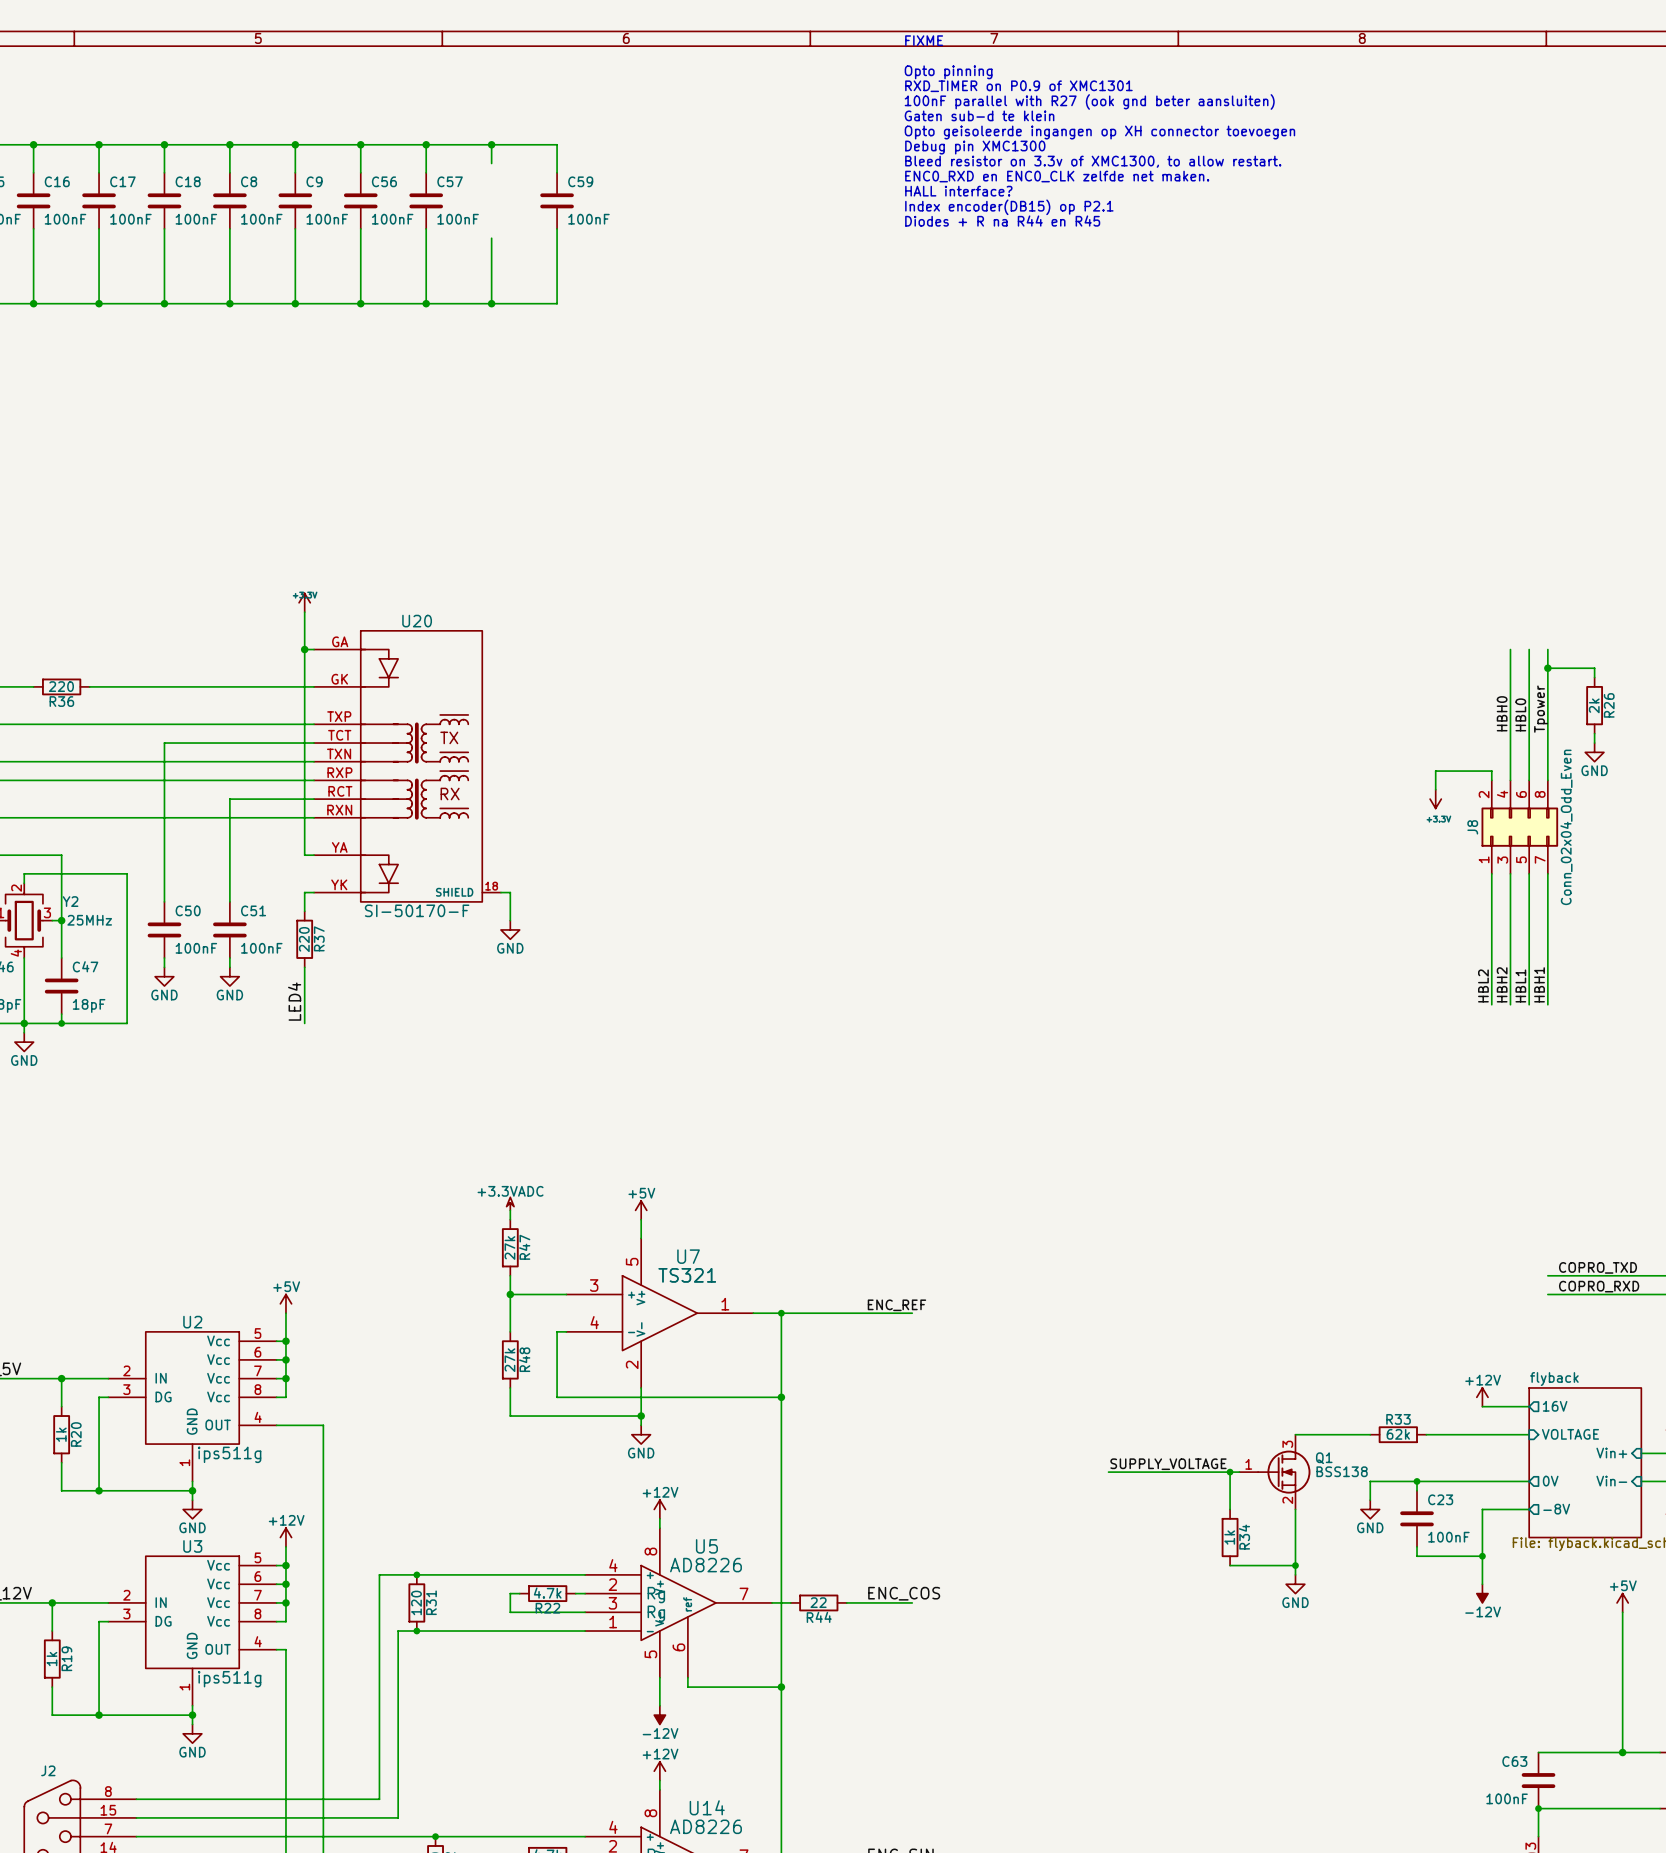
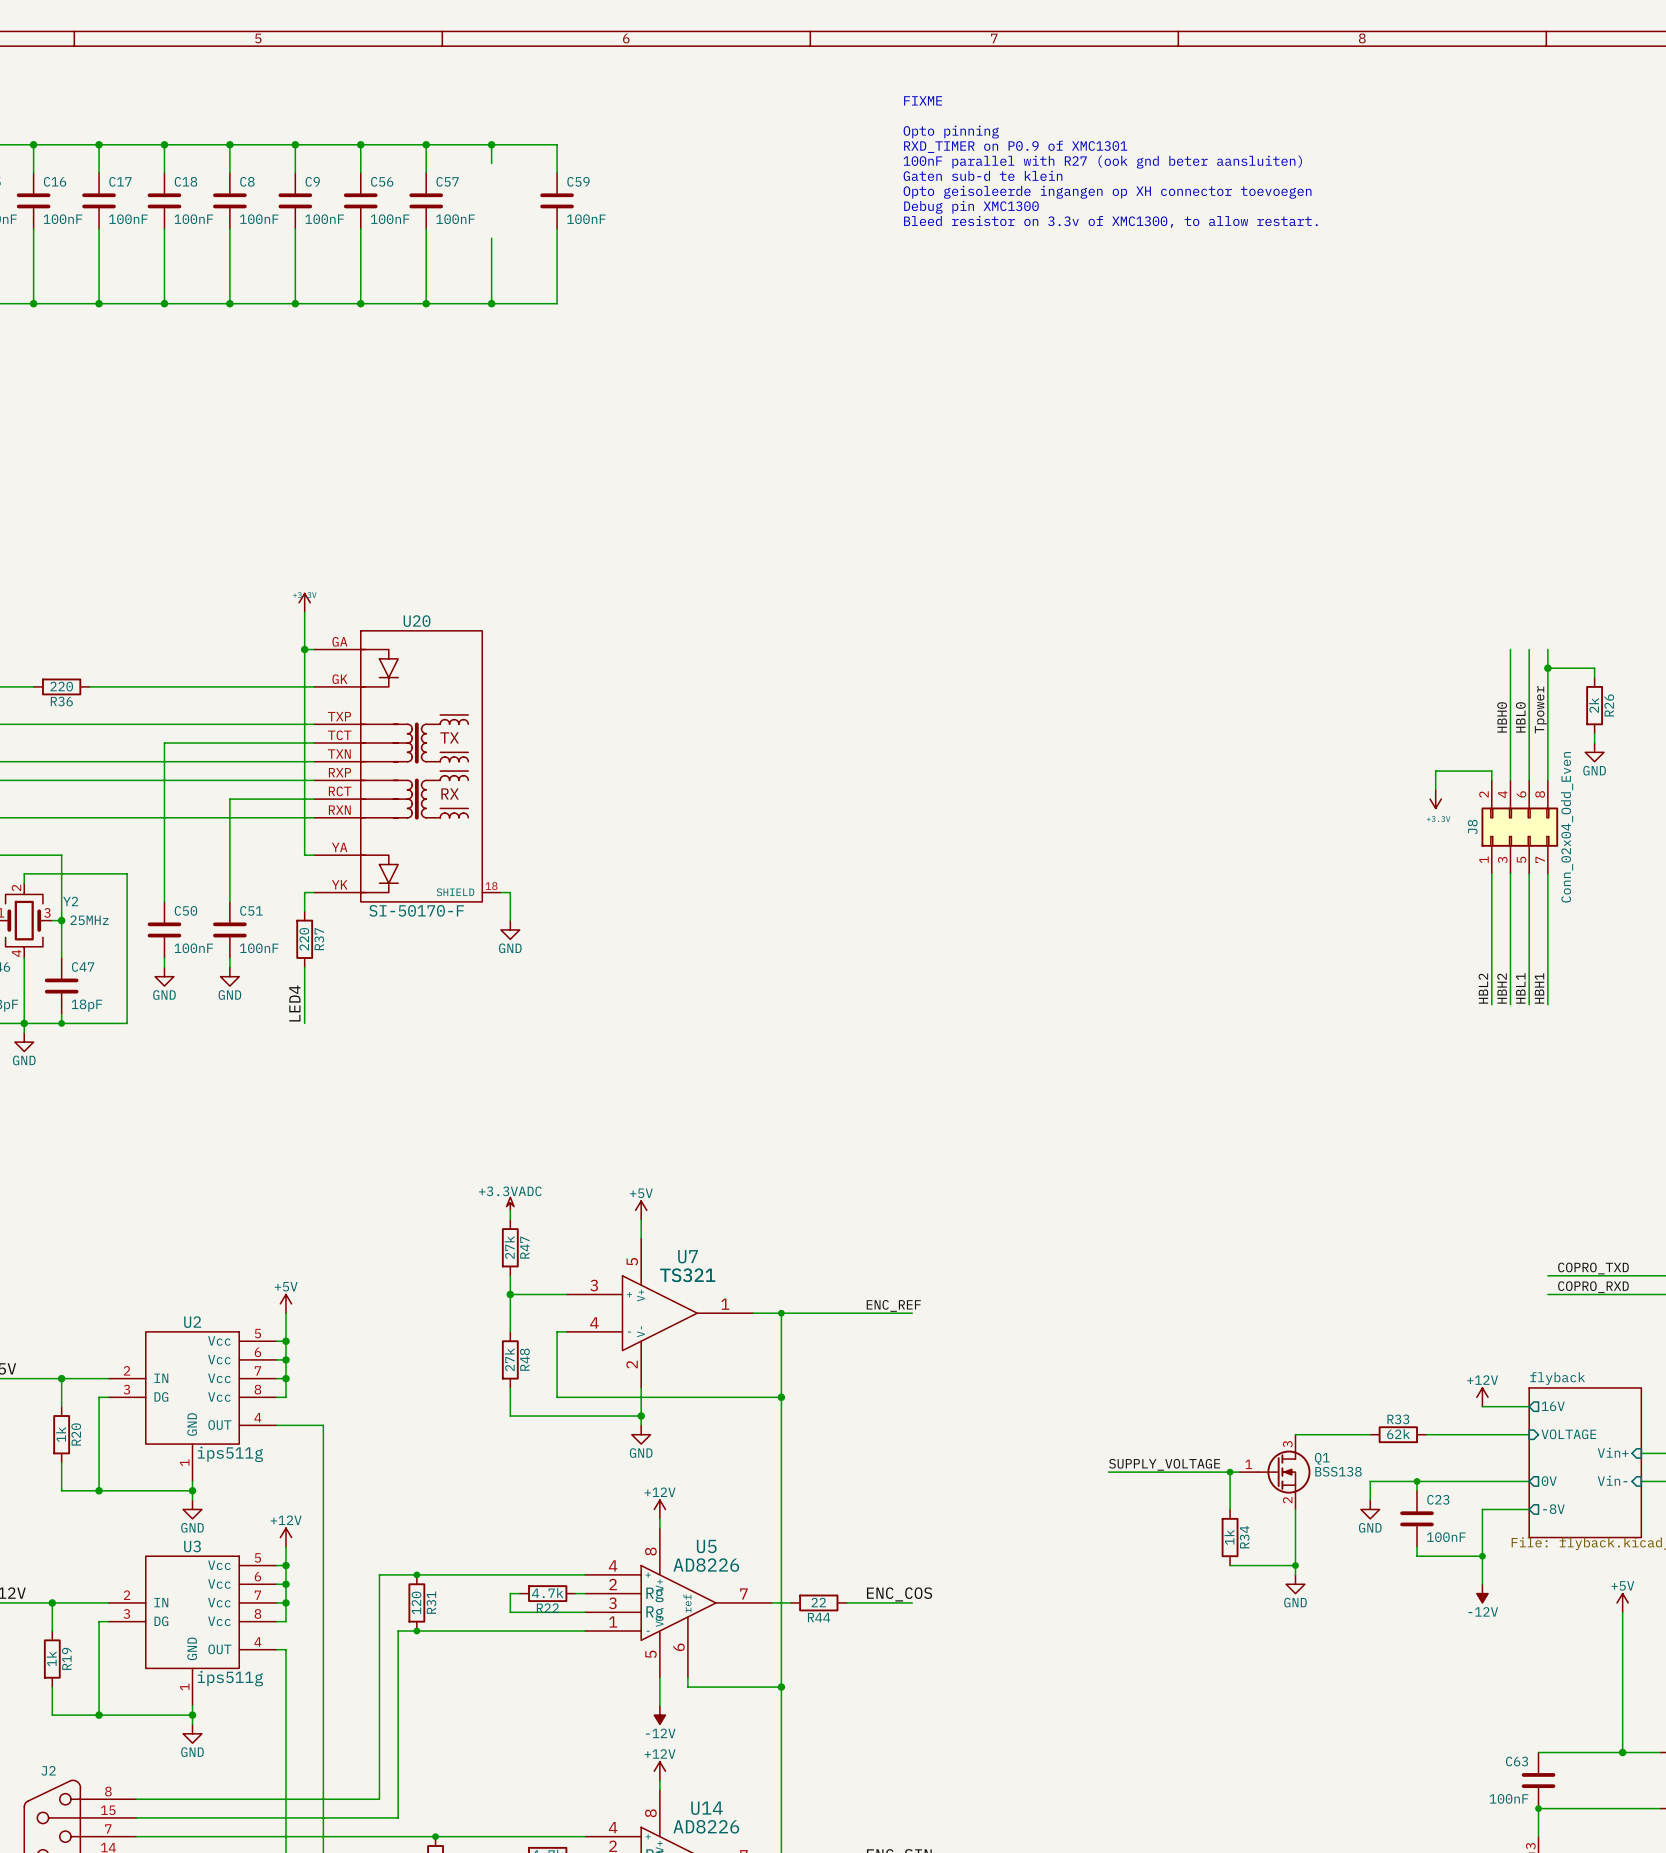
text: FIXME (924, 40) -> none
text: Opto pinning (948, 72) -> none
text: RXD_TIMER on P0.9 of XMC1301 (1018, 86) -> none
text: 100nF parallel with R27 (ook gnd beter aansluiten) (1089, 101) -> FIXME (923, 100)
text: Gaten sub-d te klein (979, 115) -> none
text: Opto geisoleerde ingangen op XH connector toevoegen (1099, 132) -> Opto pinning (951, 132)
text: Debug pin XMC1300 (975, 147) -> RXD_TIMER on P0.9 of XMC1301 (1015, 146)
text: Bleed resistor on 3.3v of XMC1300, to allow restart. (1093, 161) -> 100nF parallel with R27 (ook gnd beter aansluiten) (1102, 162)
text: ENC0_RXD en ENC0_CLK zelfde net maken. (1057, 176) -> Gaten sub-d te klein (983, 175)
text: HALL interface? (958, 191) -> Opto geisoleerde ingangen op XH connector toevoegen (1107, 192)
text: Index encoder(DB15) op P2.1 (1009, 207) -> Debug pin XMC1300 (971, 207)
text: Diodes + R na R44 en R45 (1002, 221) -> Bleed resistor on 3.3v of XMC1300, to allow restart. (1110, 221)

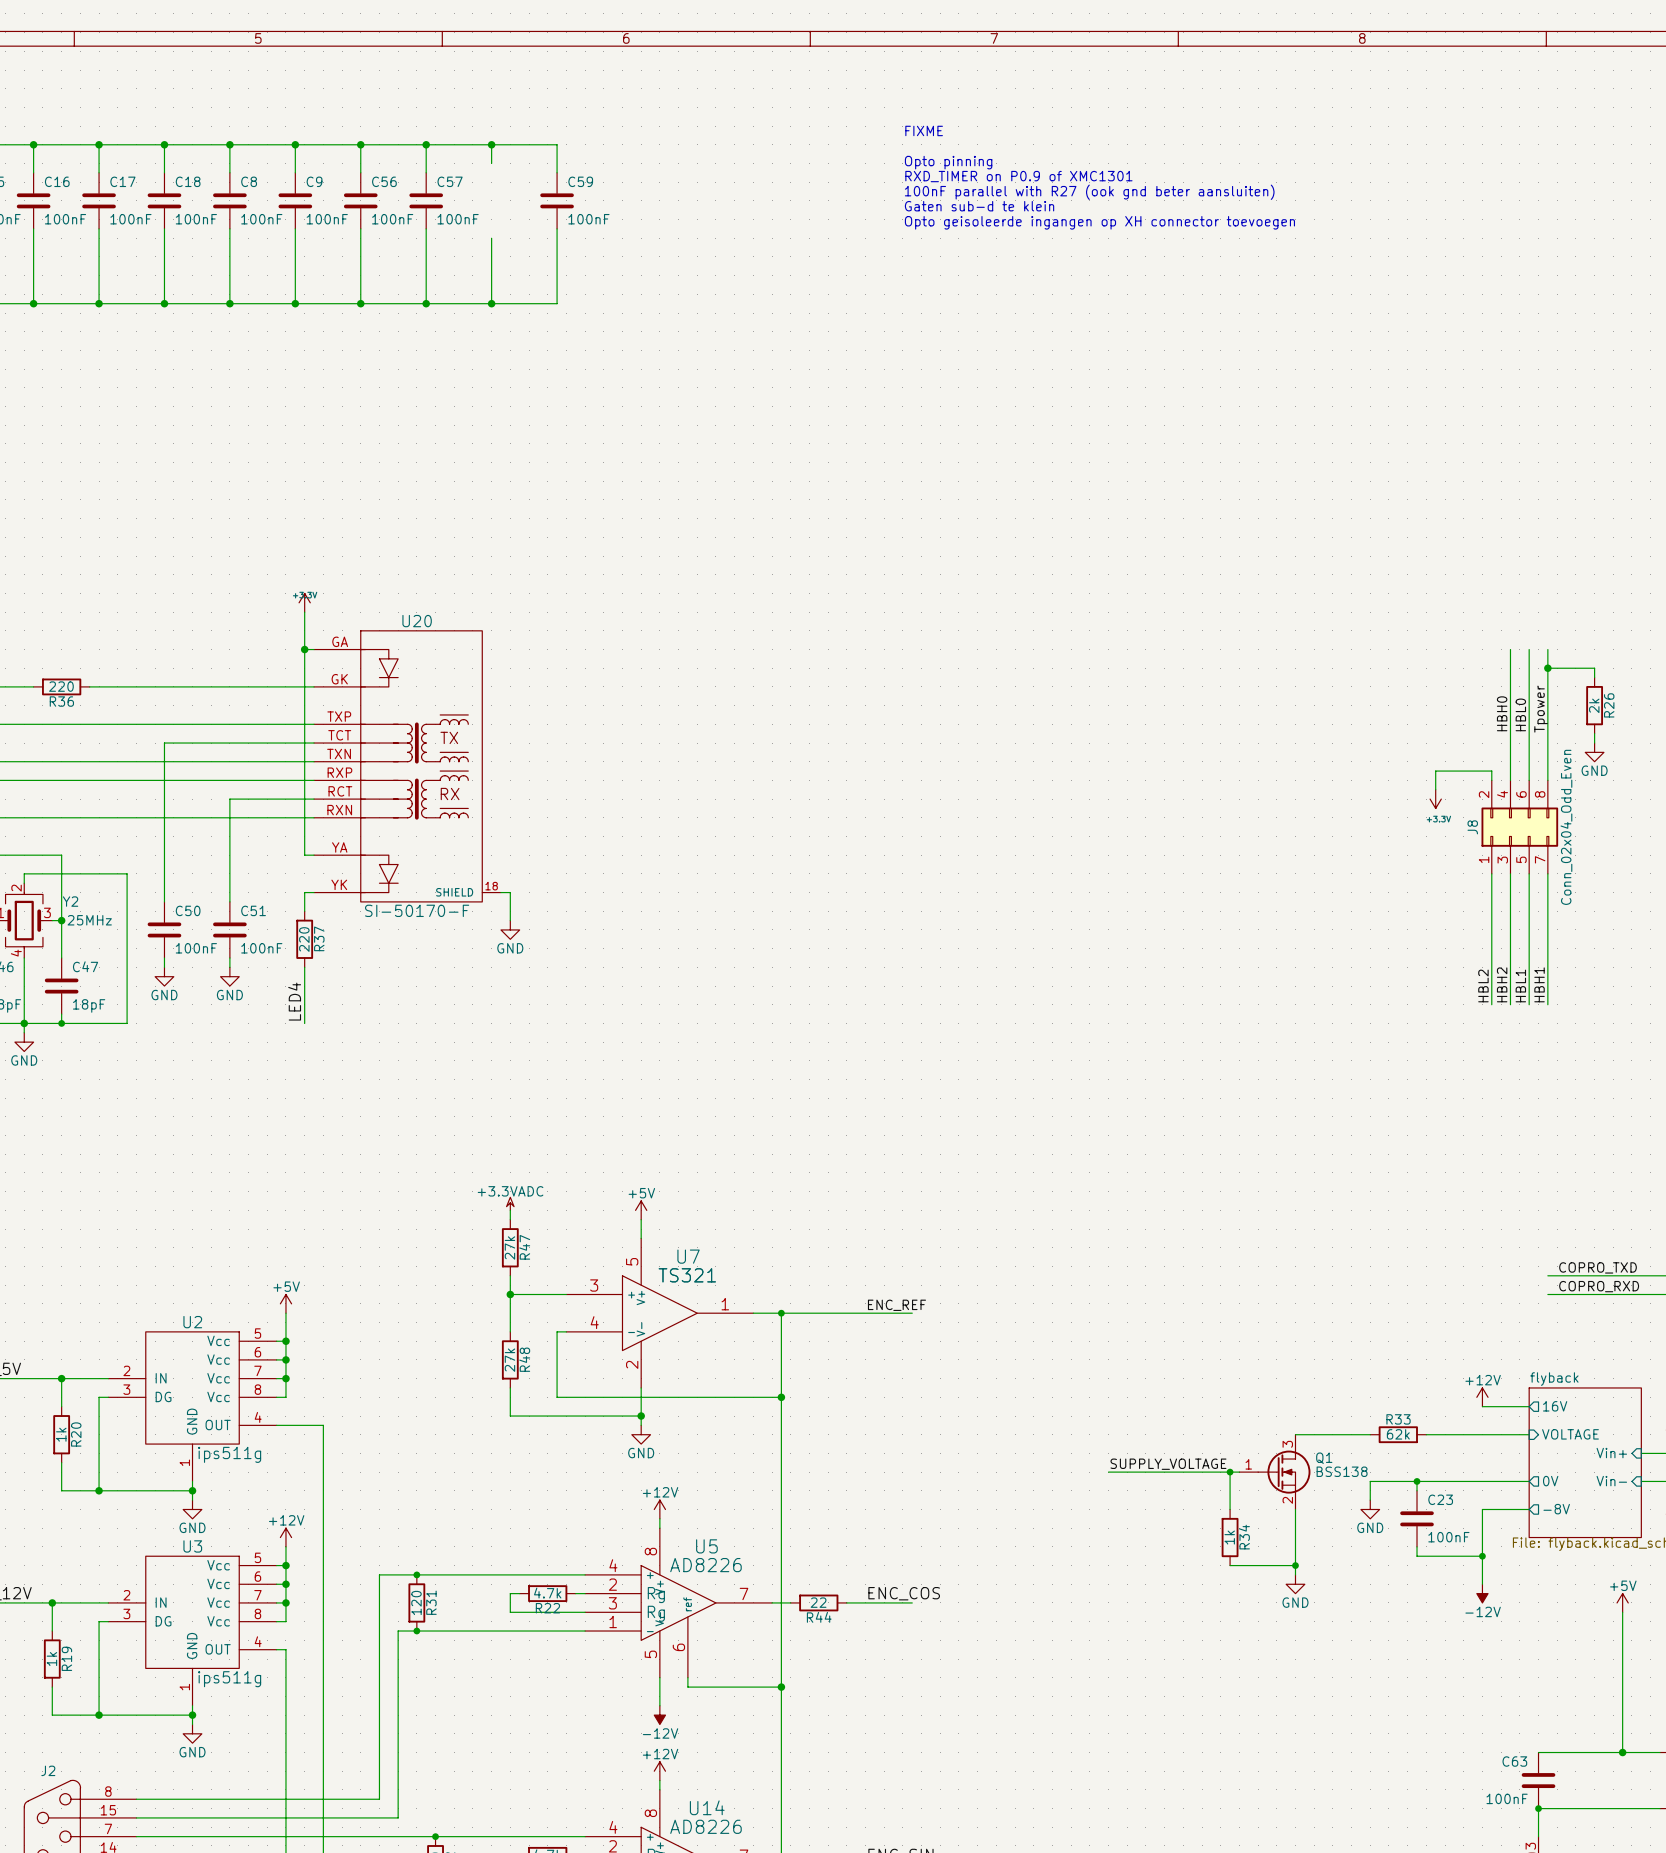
text: FIXME (923, 100) -> none
text: Opto pinning (951, 132) -> FIXME (924, 130)
text: RXD_TIMER on P0.9 of XMC1301 (1015, 146) -> none
text: 100nF parallel with R27 (ook gnd beter aansluiten) (1102, 162) -> Opto pinning (948, 162)
text: Gaten sub-d te klein (983, 175) -> RXD_TIMER on P0.9 of XMC1301 (1018, 176)
text: Opto geisoleerde ingangen op XH connector toevoegen (1107, 192) -> 100nF parallel with R27 (ook gnd beter aansluiten) (1089, 192)
text: Debug pin XMC1300 (971, 207) -> Gaten sub-d te klein (979, 206)
text: Bleed resistor on 3.3v of XMC1300, to allow restart. (1110, 221) -> Opto geisoleerde ingangen op XH connector toevoegen (1099, 222)

